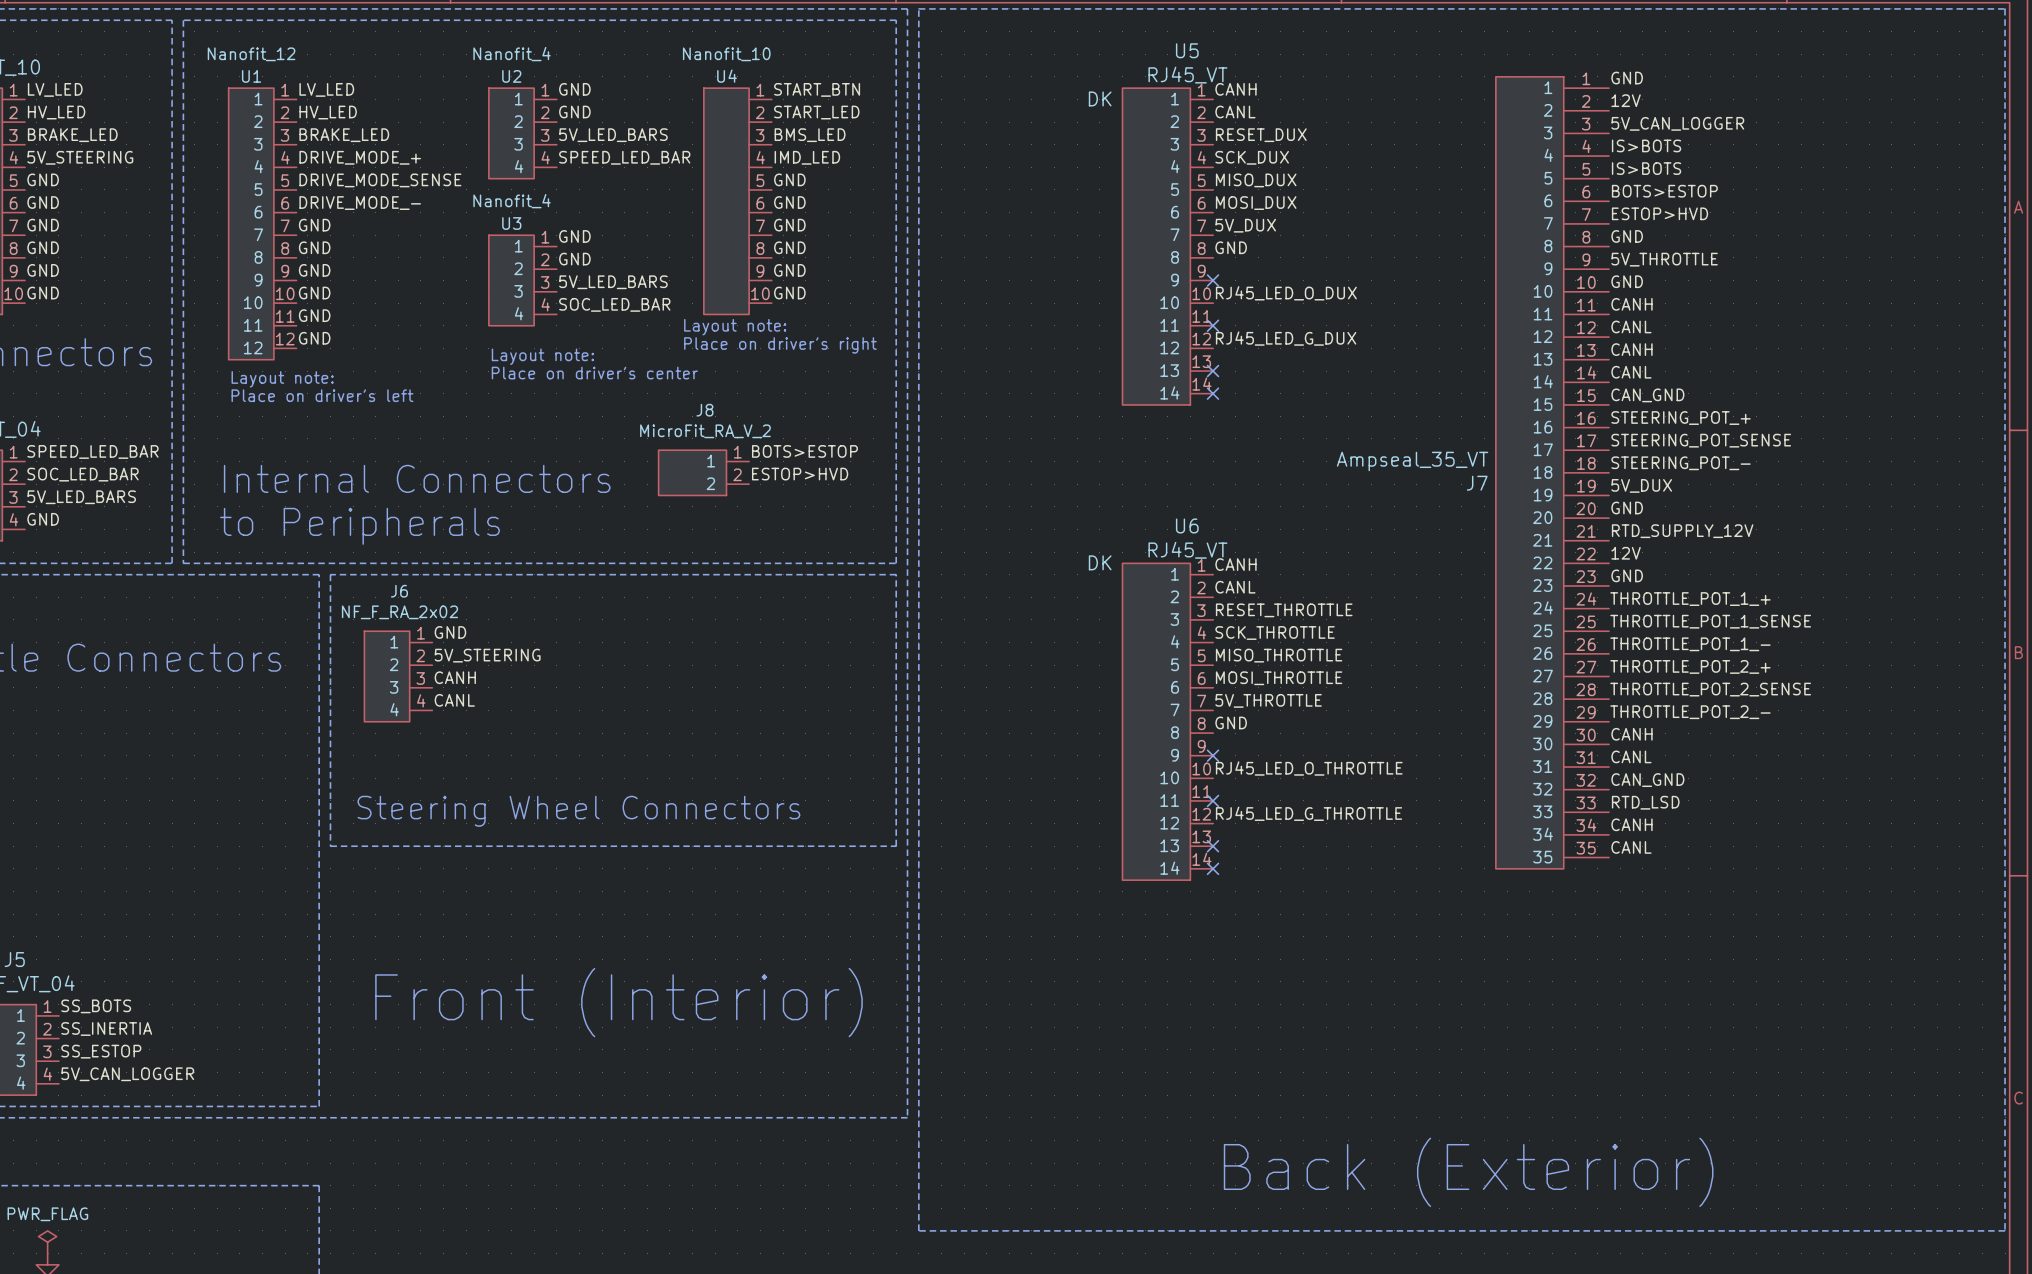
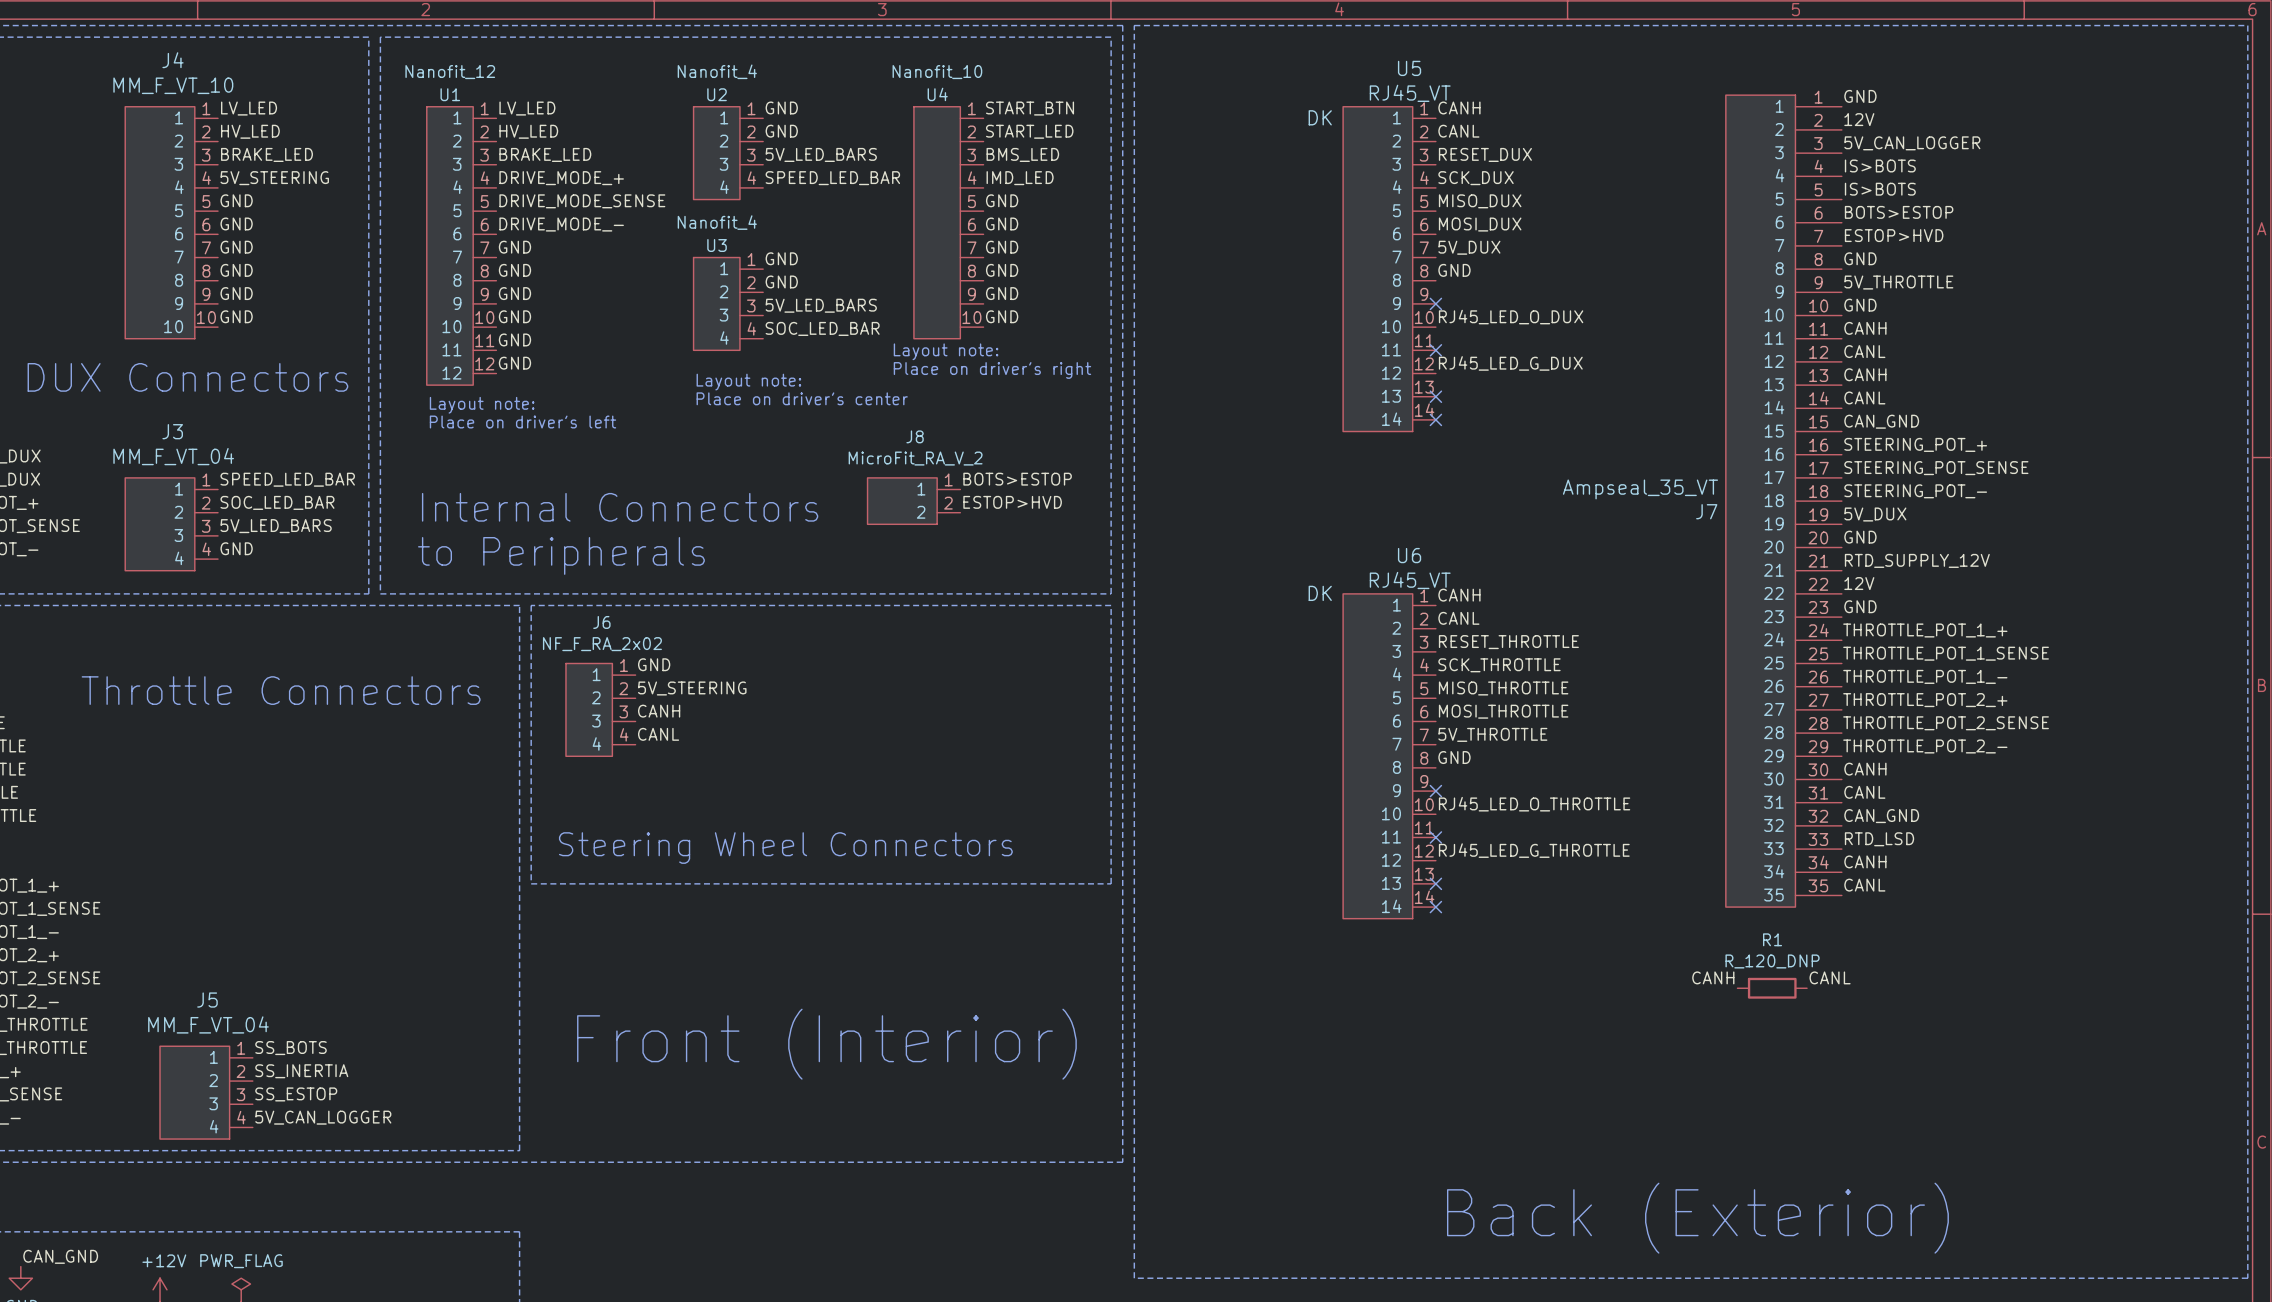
label: none -> CANH (1713, 977)
label: none -> CANL (1830, 977)
R1: none -> R_120_DNP (1772, 988)

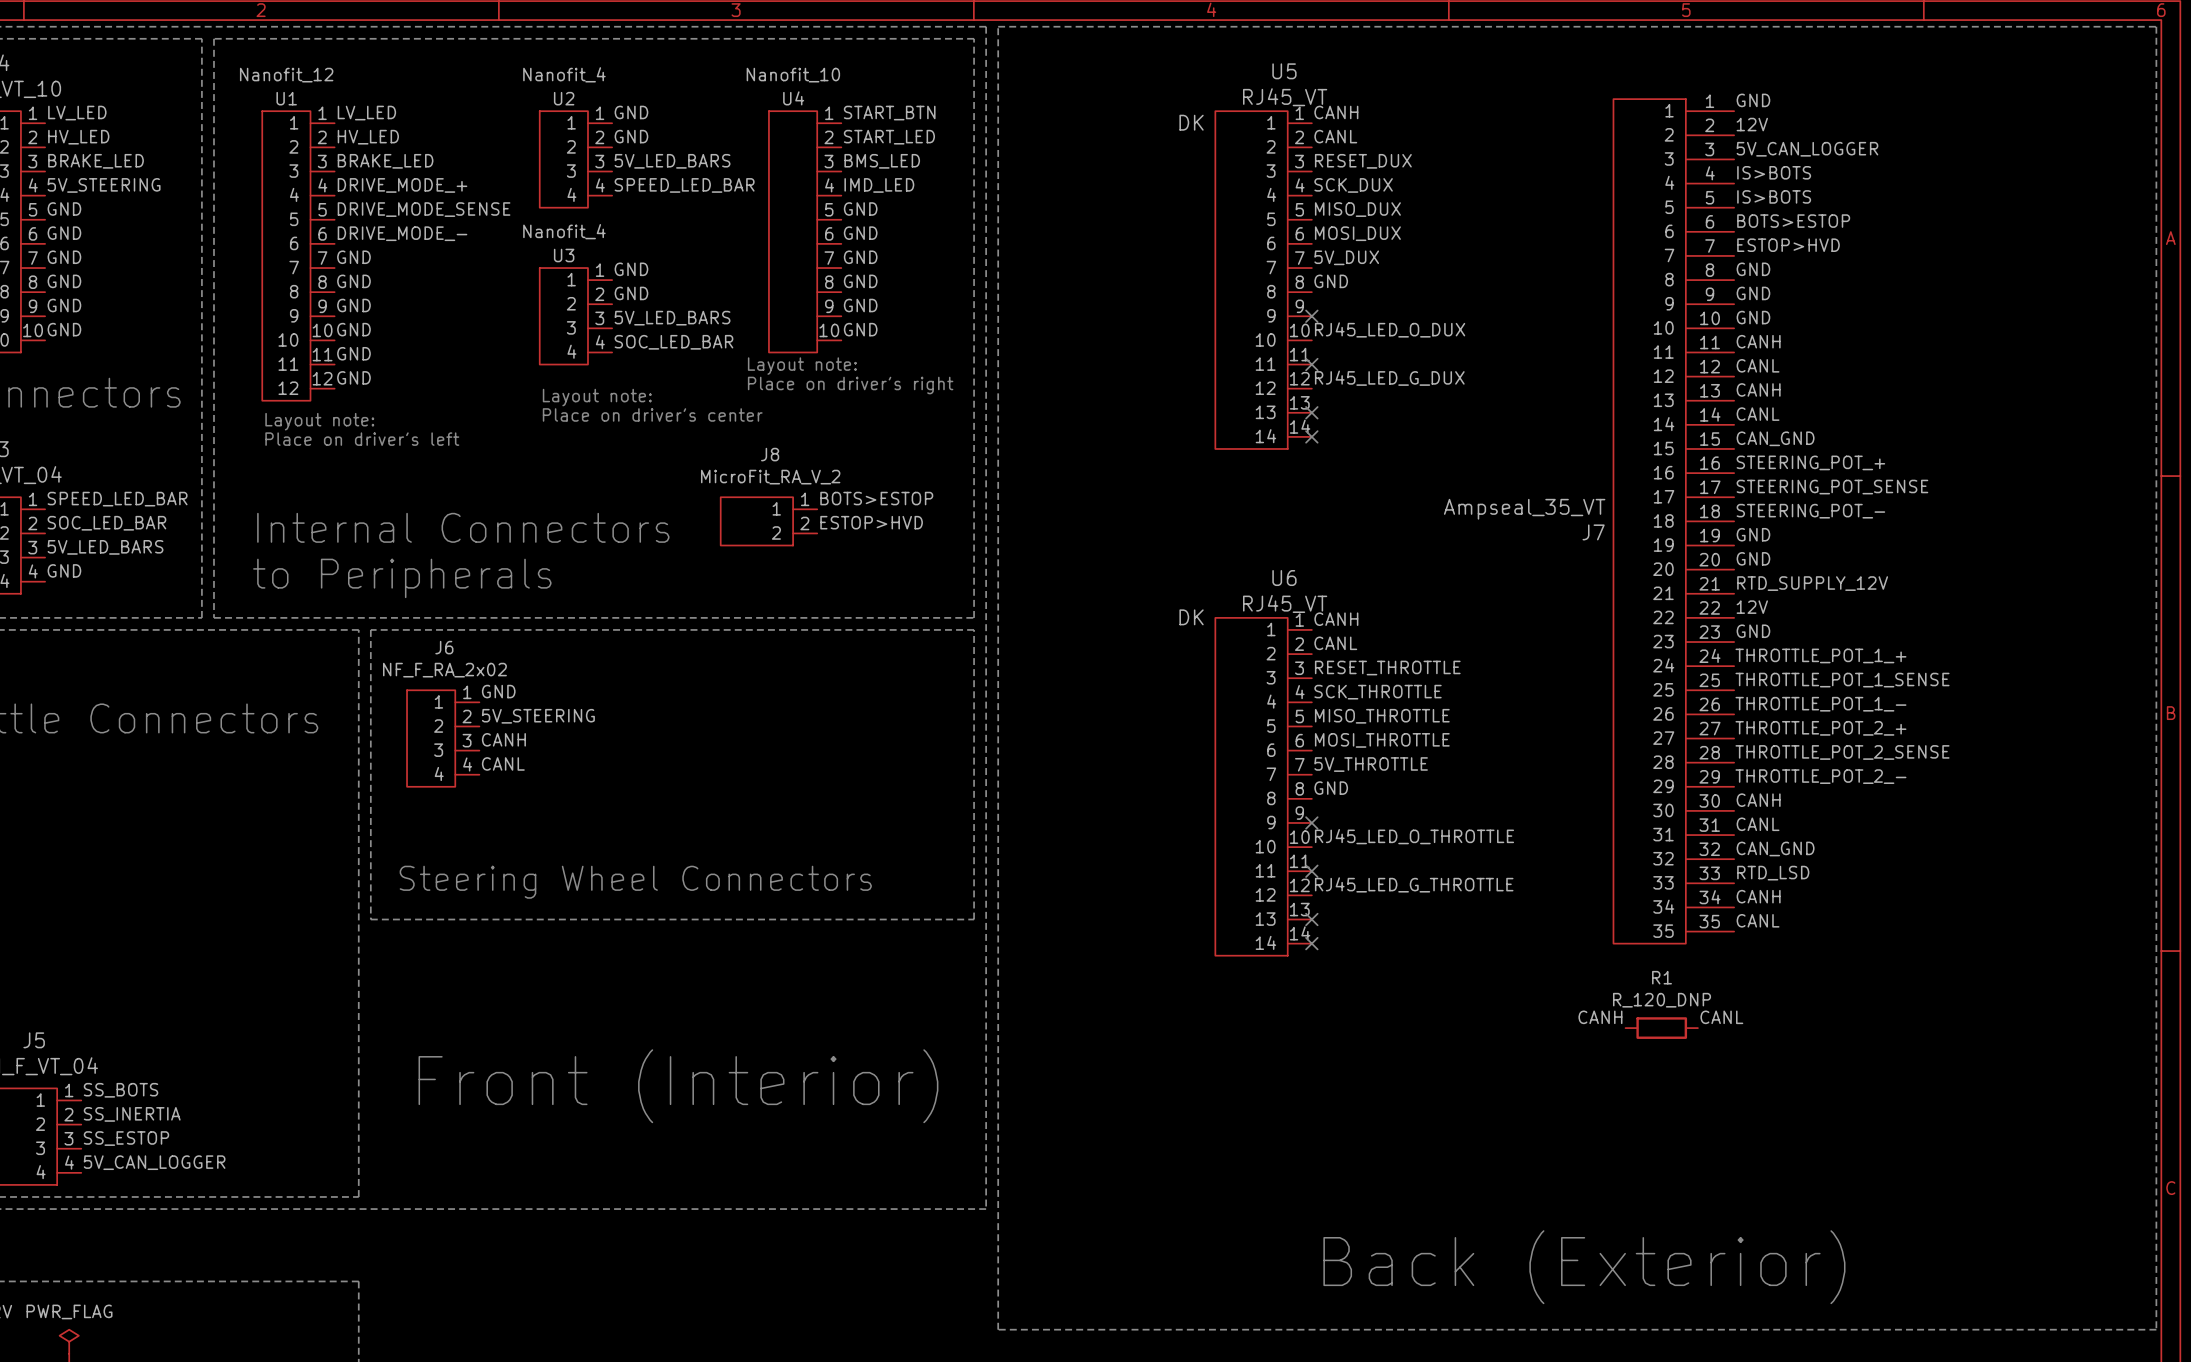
label: 5V_THROTTLE (1898, 282) -> GND (1753, 293)
label: 5V_DUX (1875, 514) -> GND (1753, 534)

